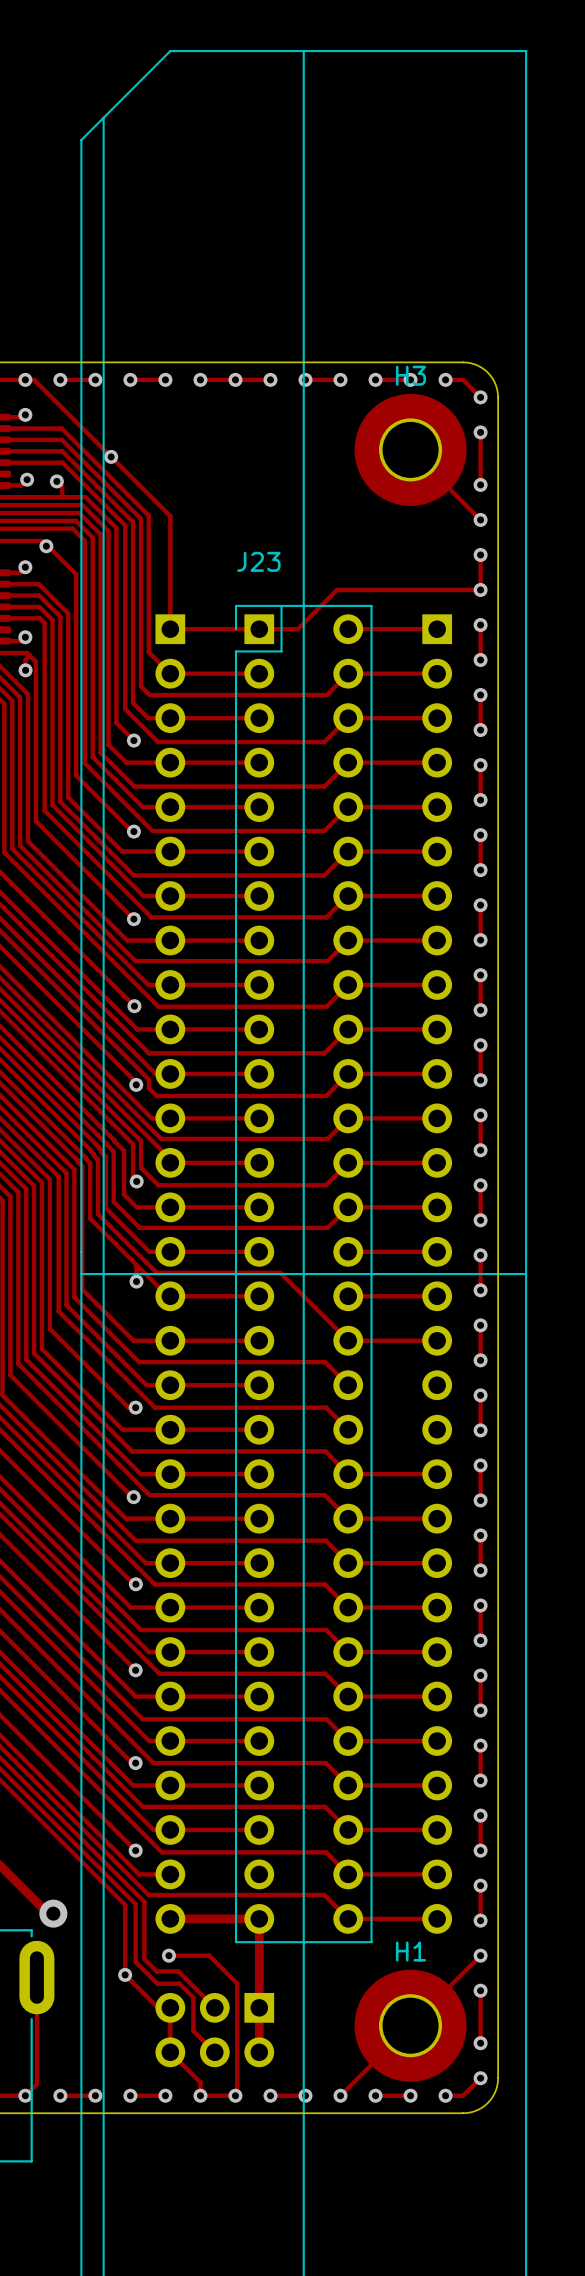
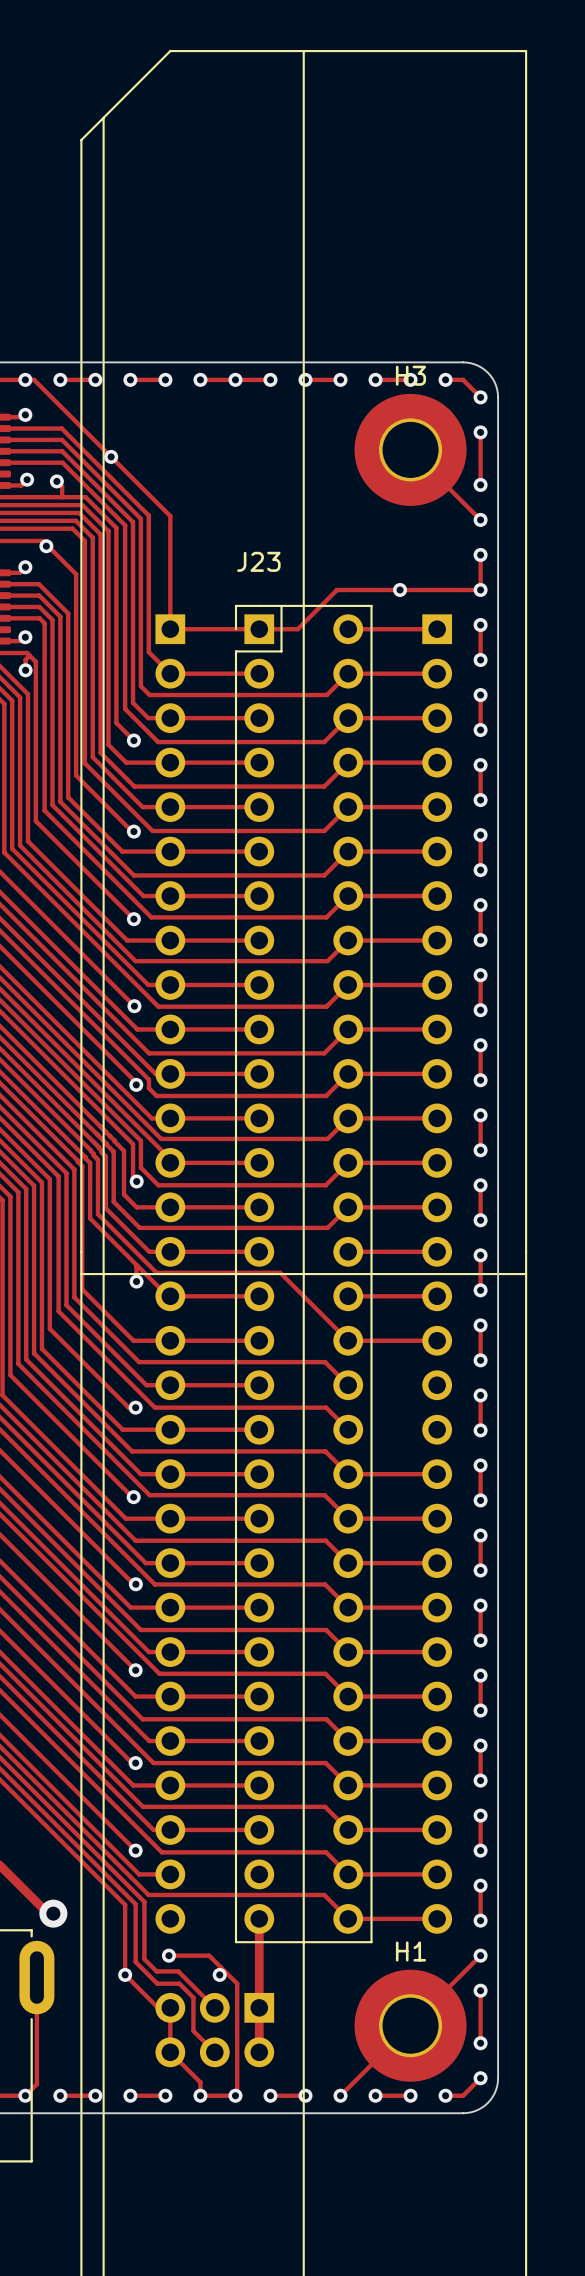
via: none -> (400, 589)
track: (170, 1918) (259, 1918) -> none
via: none -> (219, 1974)

